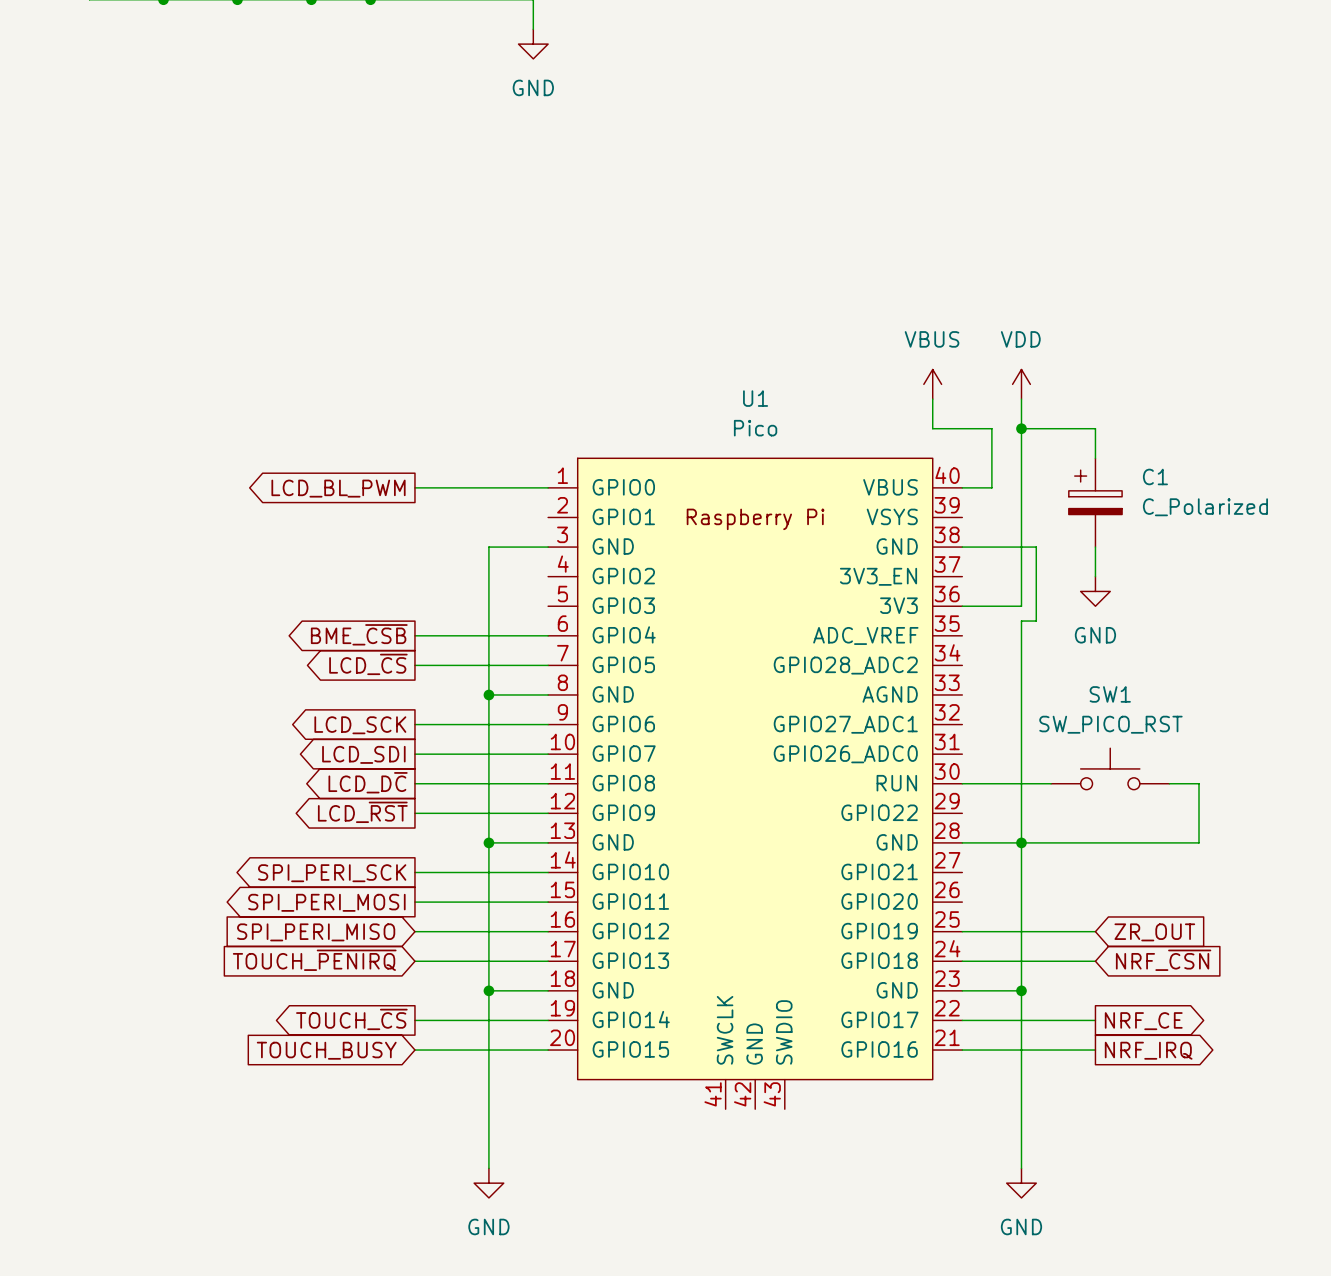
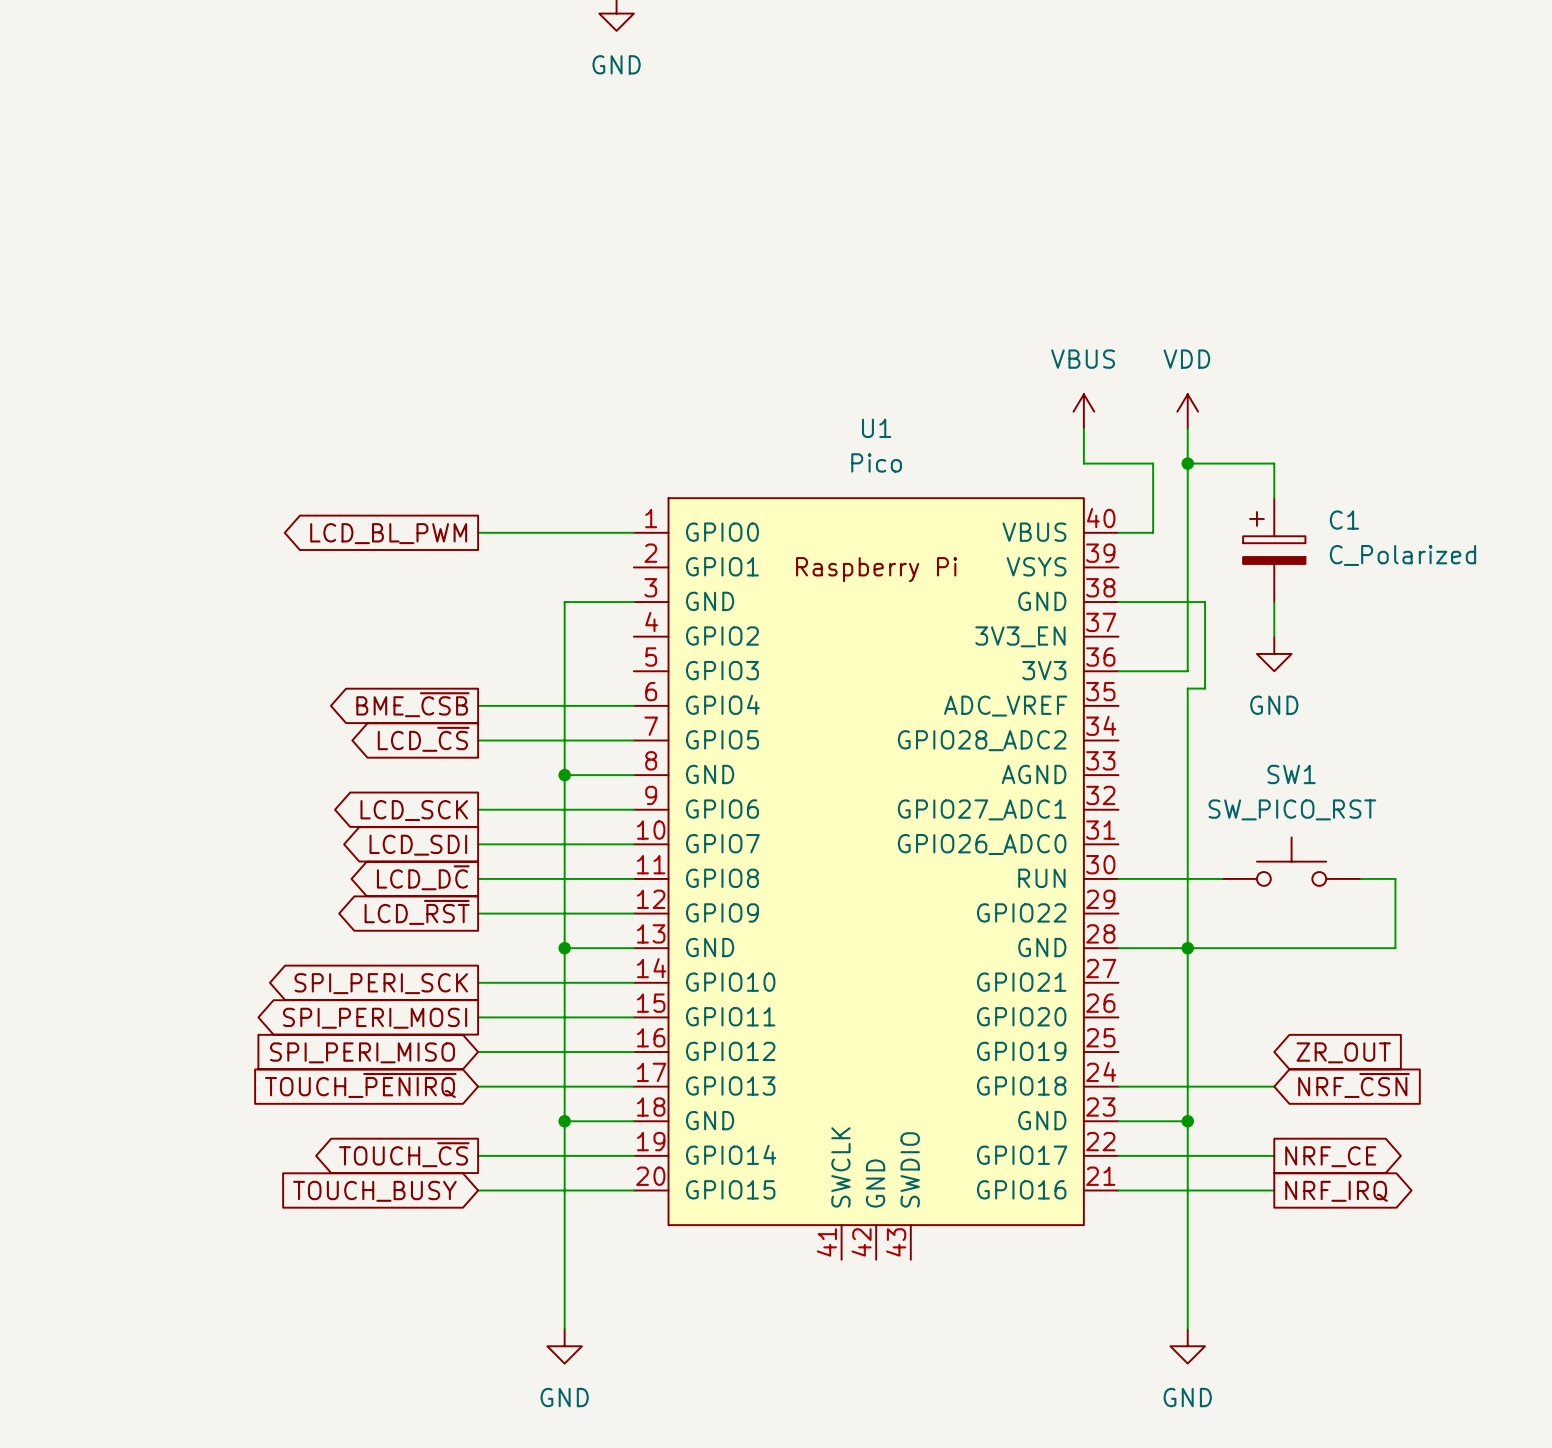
wire: (962, 931) (1095, 931) -> none

